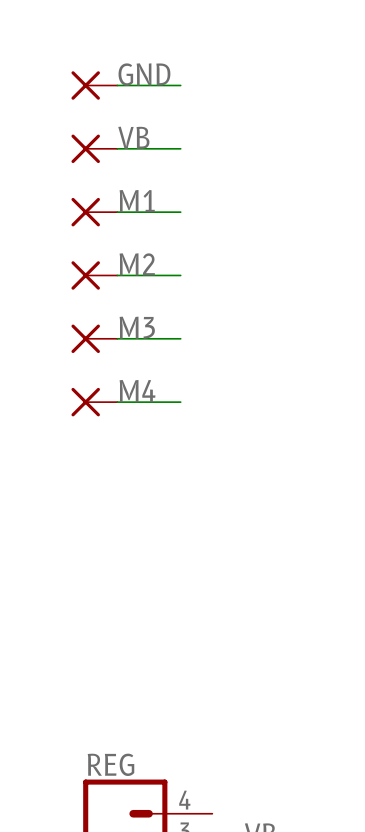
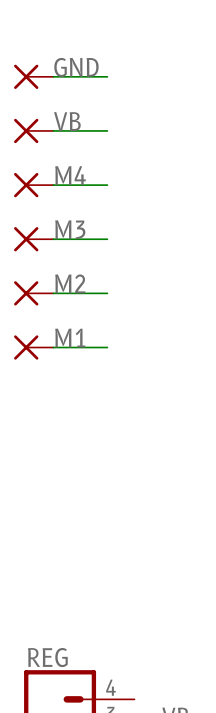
label: M1 (137, 201) -> M4 (70, 175)
label: M2 (137, 264) -> M3 (70, 229)
label: M3 (137, 327) -> M2 (70, 283)
label: M4 (137, 391) -> M1 (70, 338)

